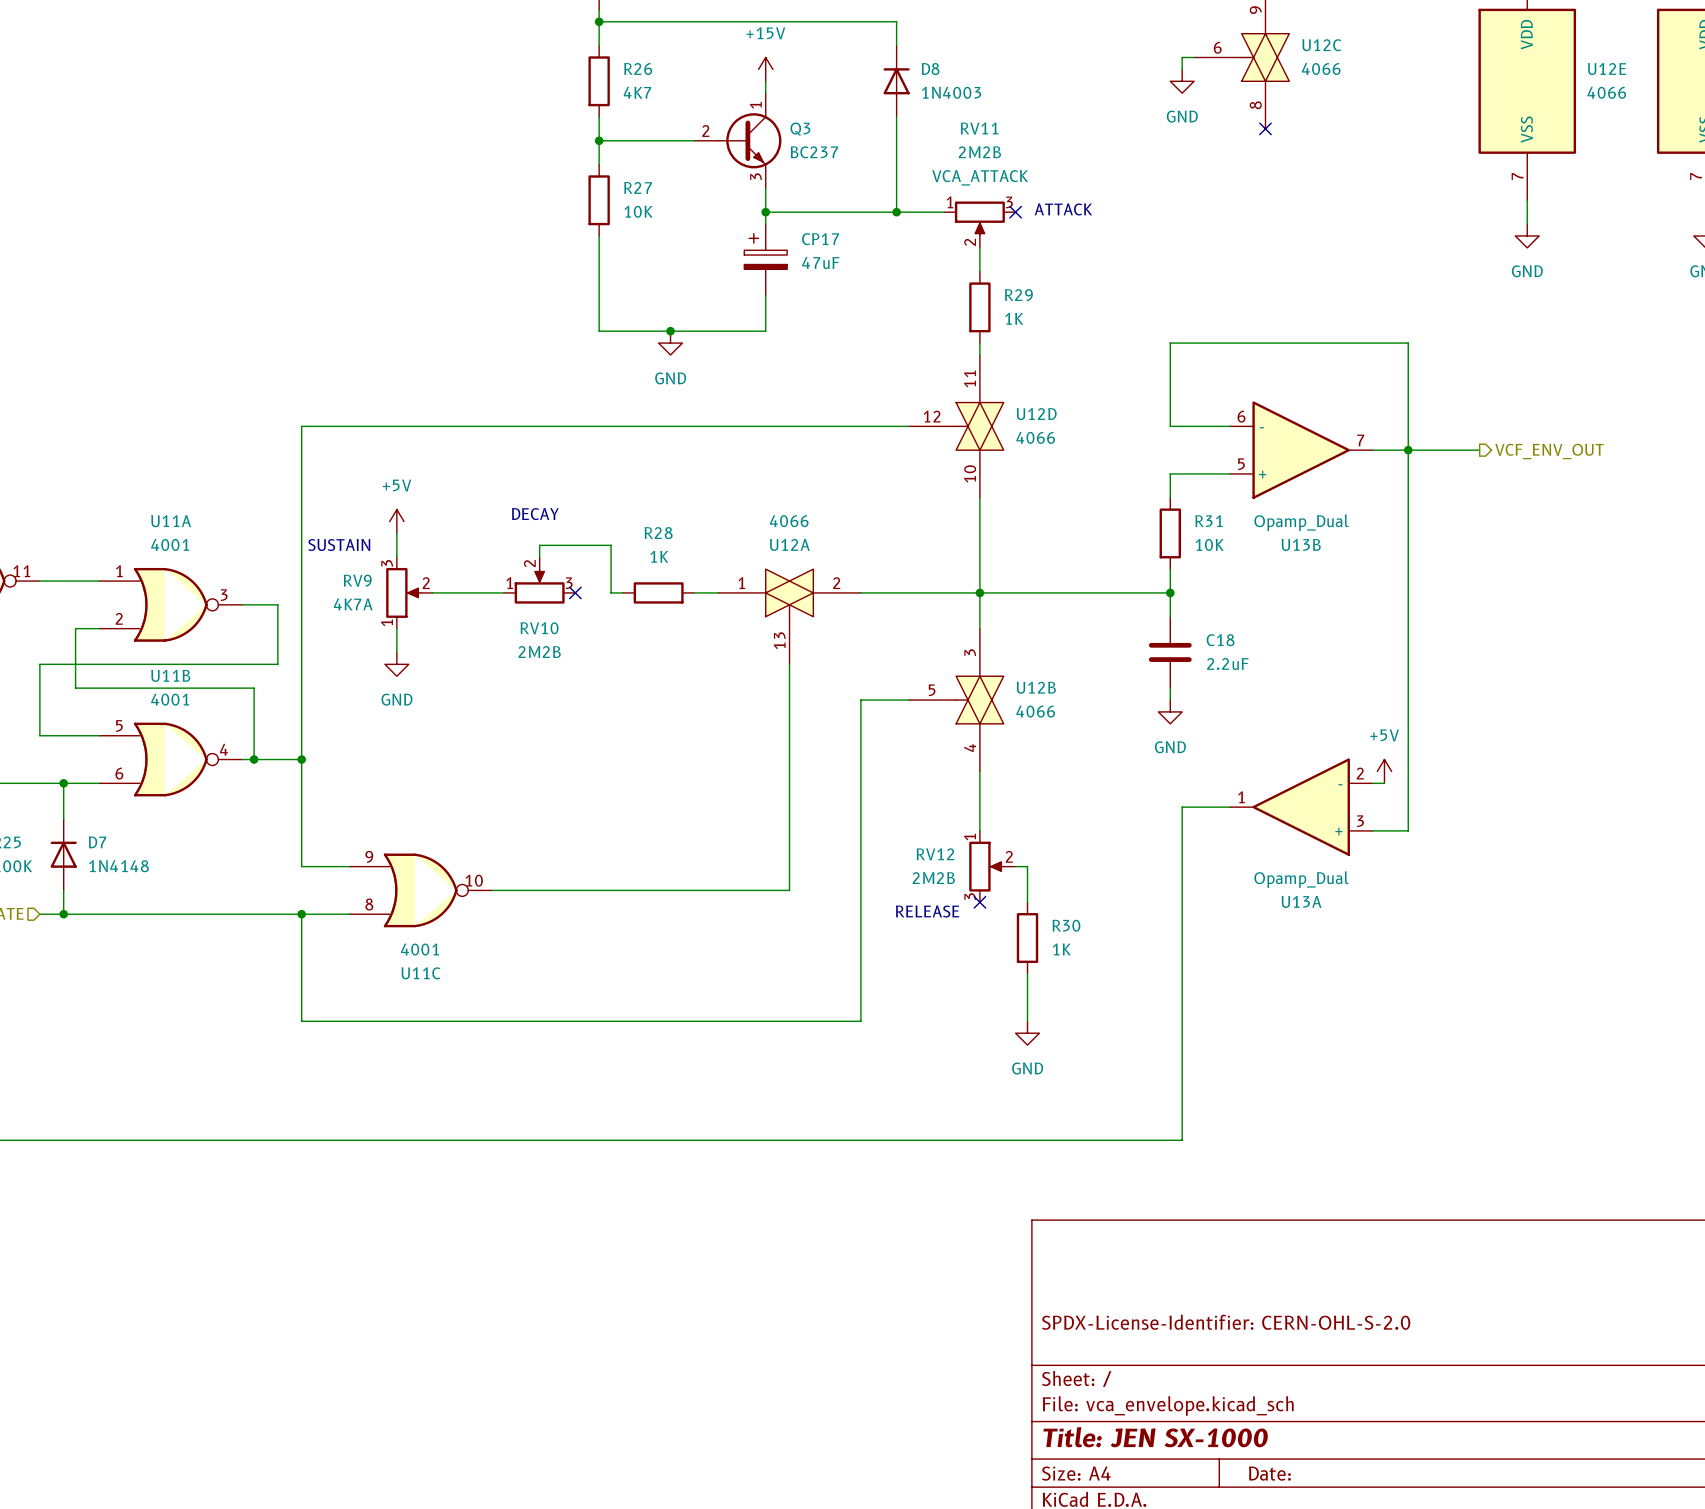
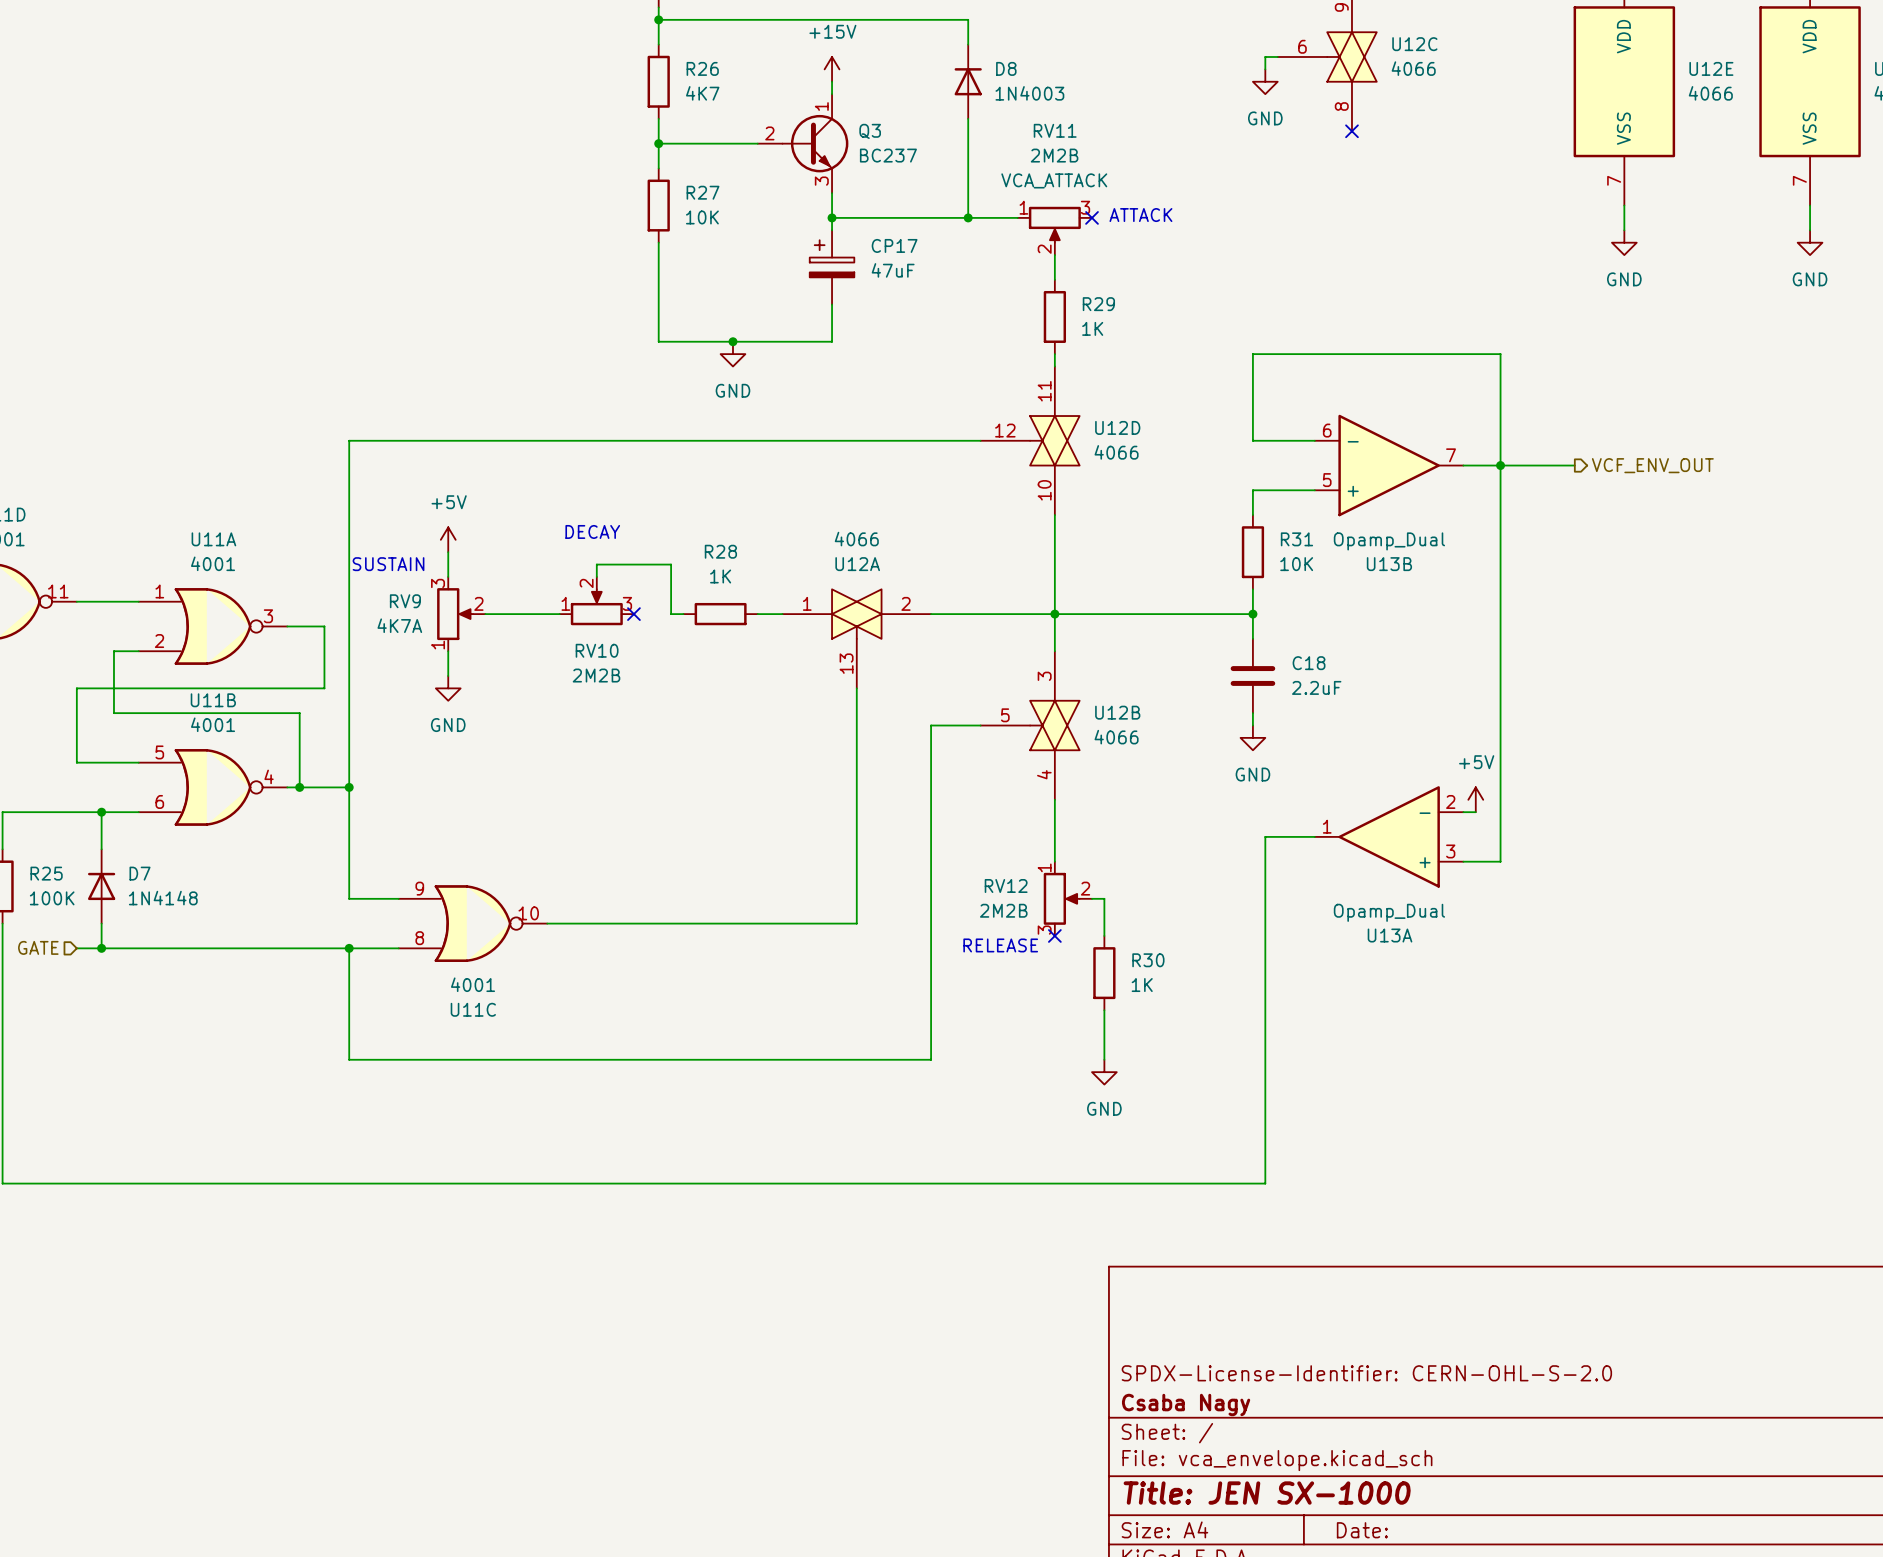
title block: none -> Csaba Nagy (1186, 1404)

